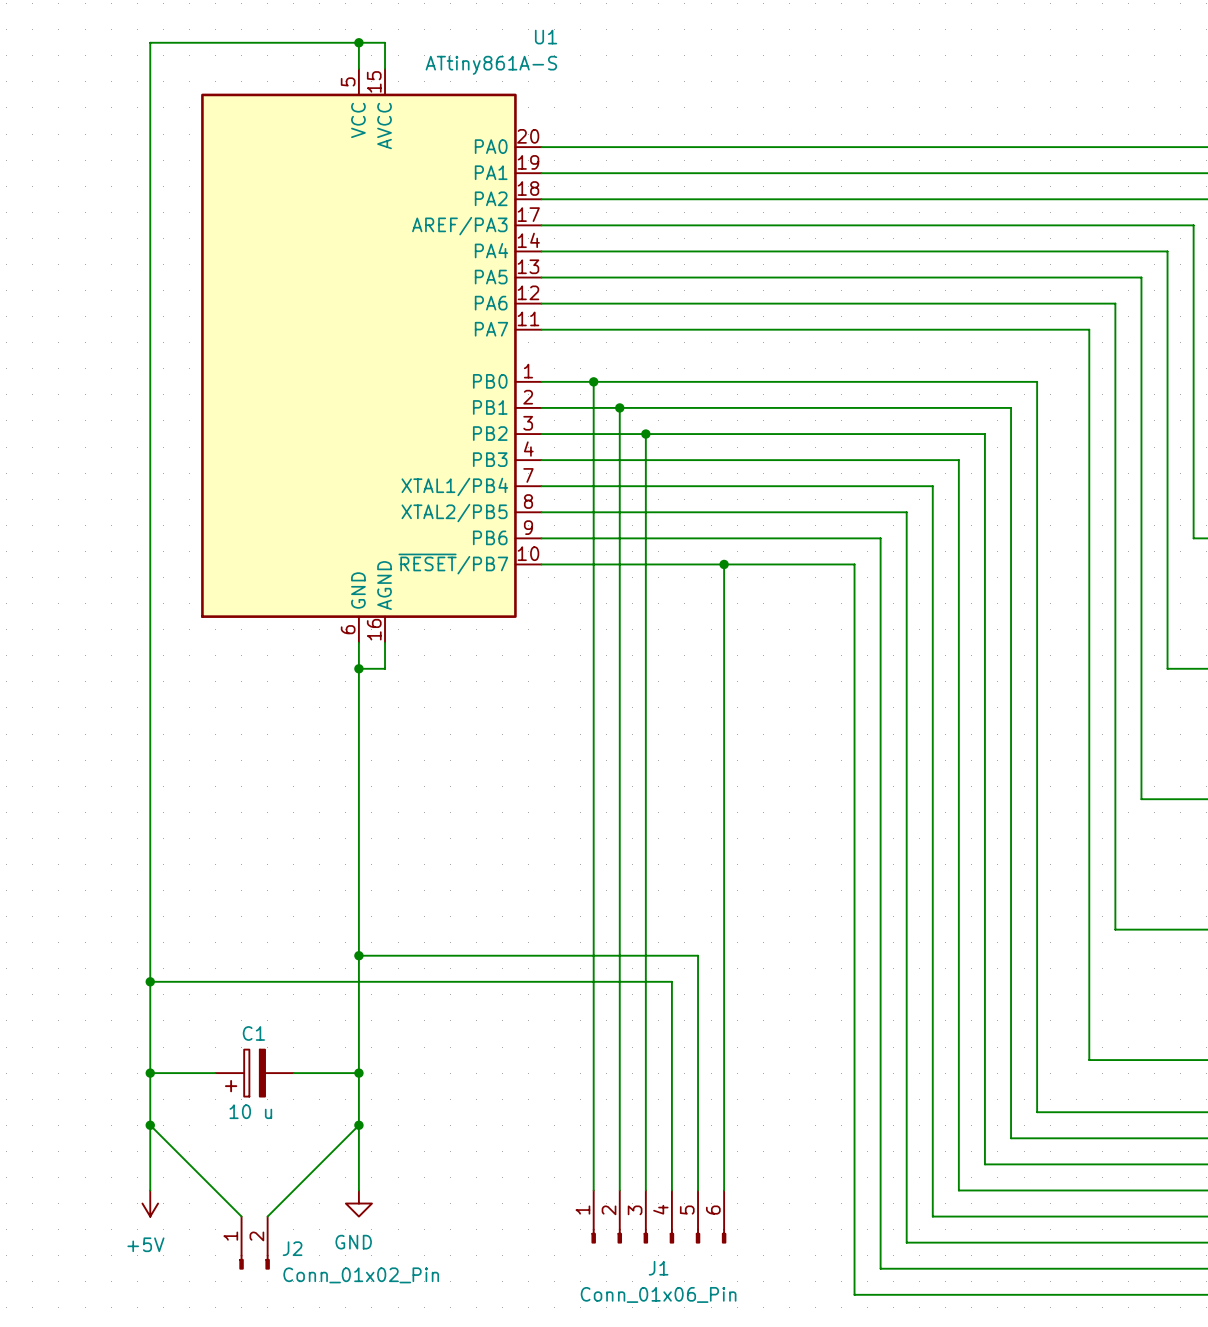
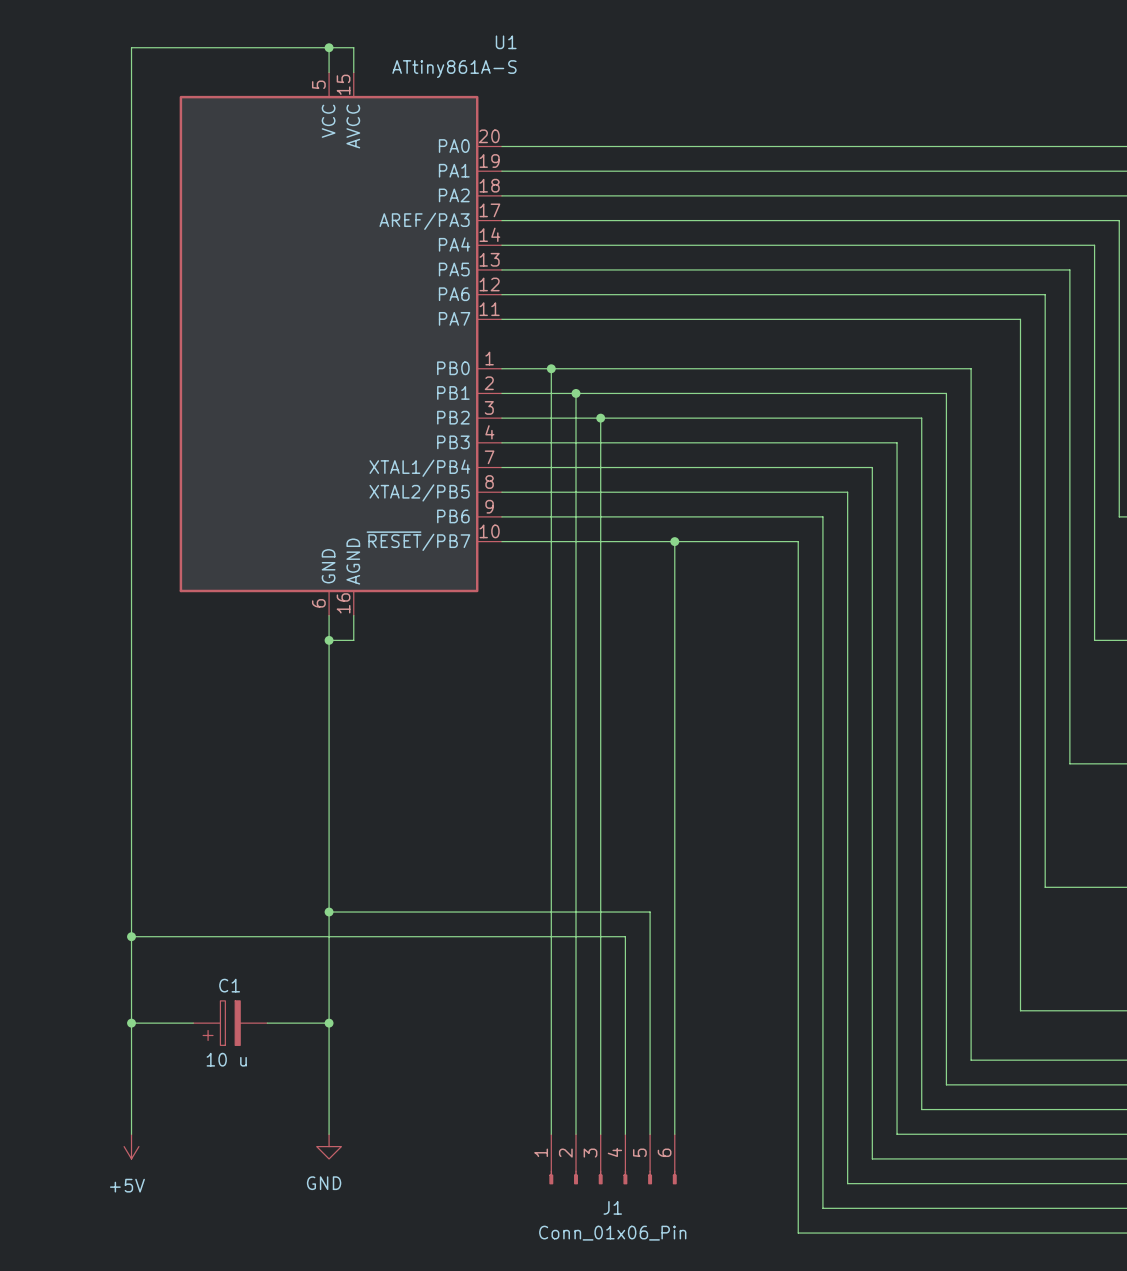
wire: (150, 1125) (241, 1216) -> none
junction: (150, 1125) -> none
wire: (358, 1125) (267, 1216) -> none
junction: (358, 1125) -> none
J2: Conn_01x02_Pin (254, 1243) -> none

